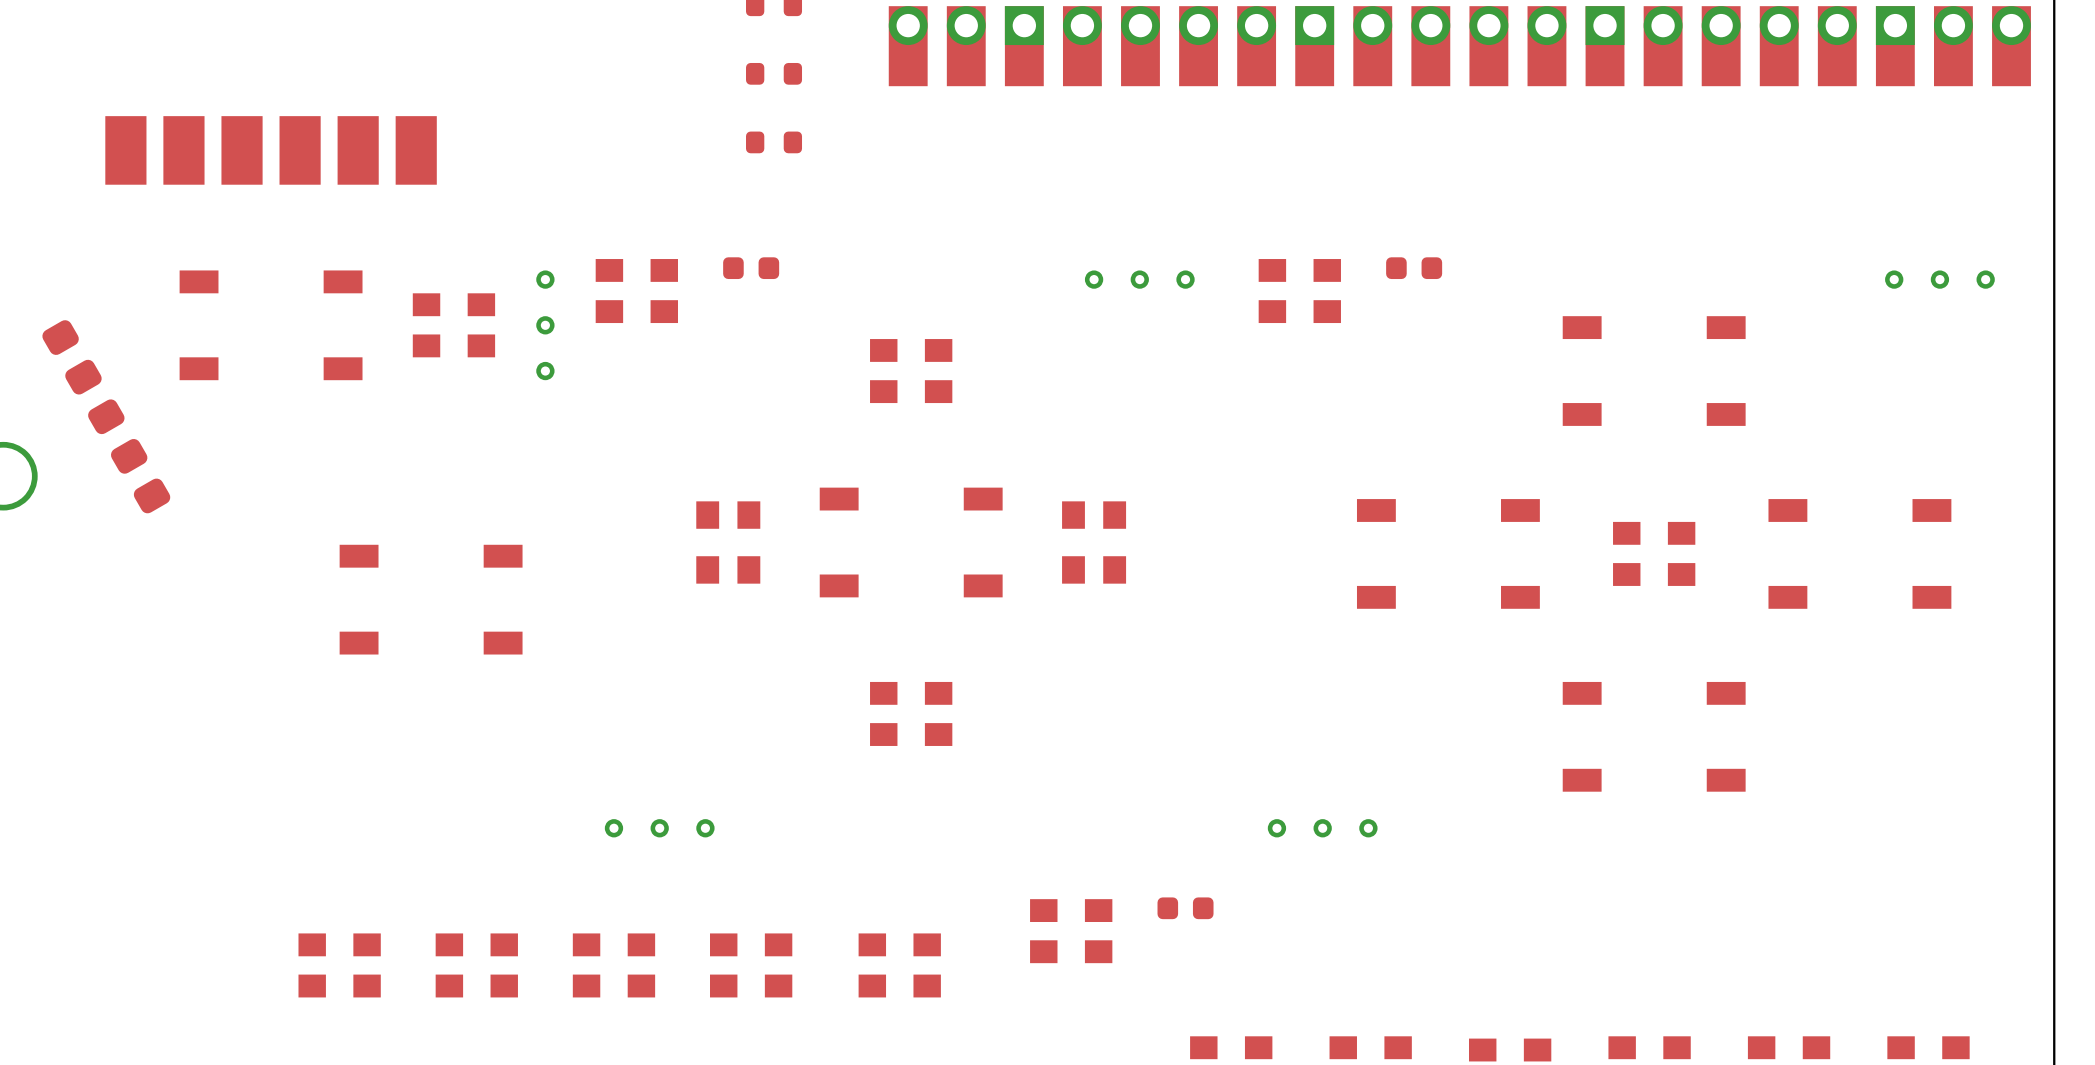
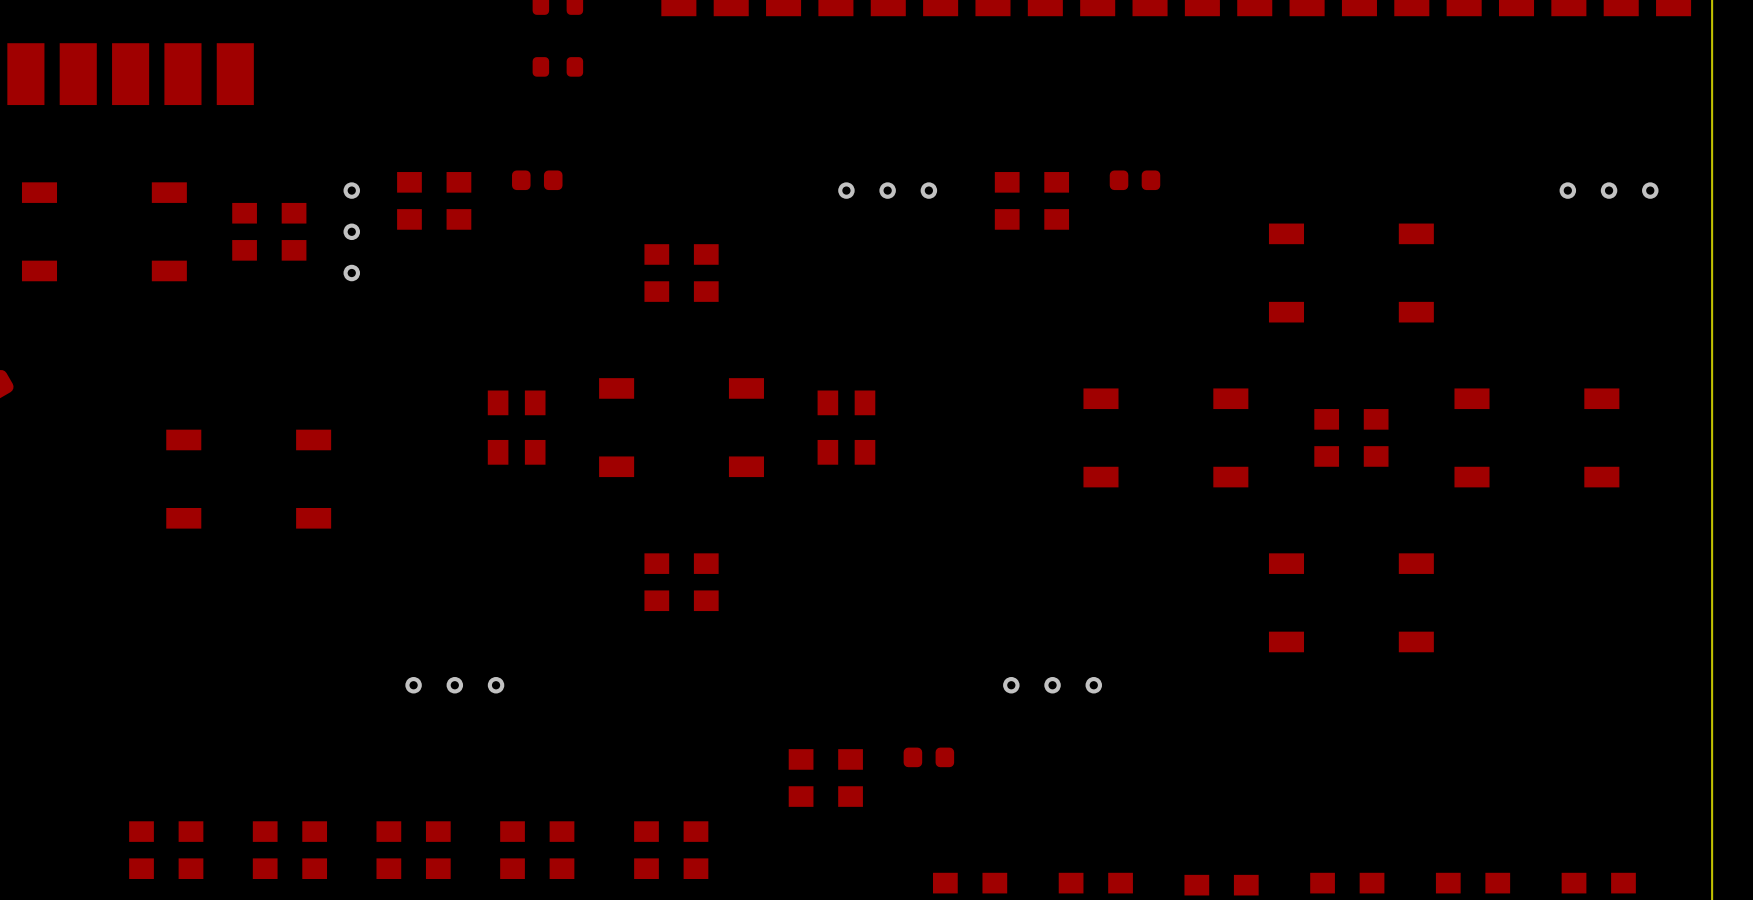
part: (339, 965) -> none
part: (476, 965) -> none
part: (613, 965) -> none
part: (751, 965) -> none
part: (899, 965) -> none
part: none -> (166, 850)
part: none -> (289, 850)
part: none -> (413, 850)
part: none -> (537, 850)
part: none -> (671, 850)

